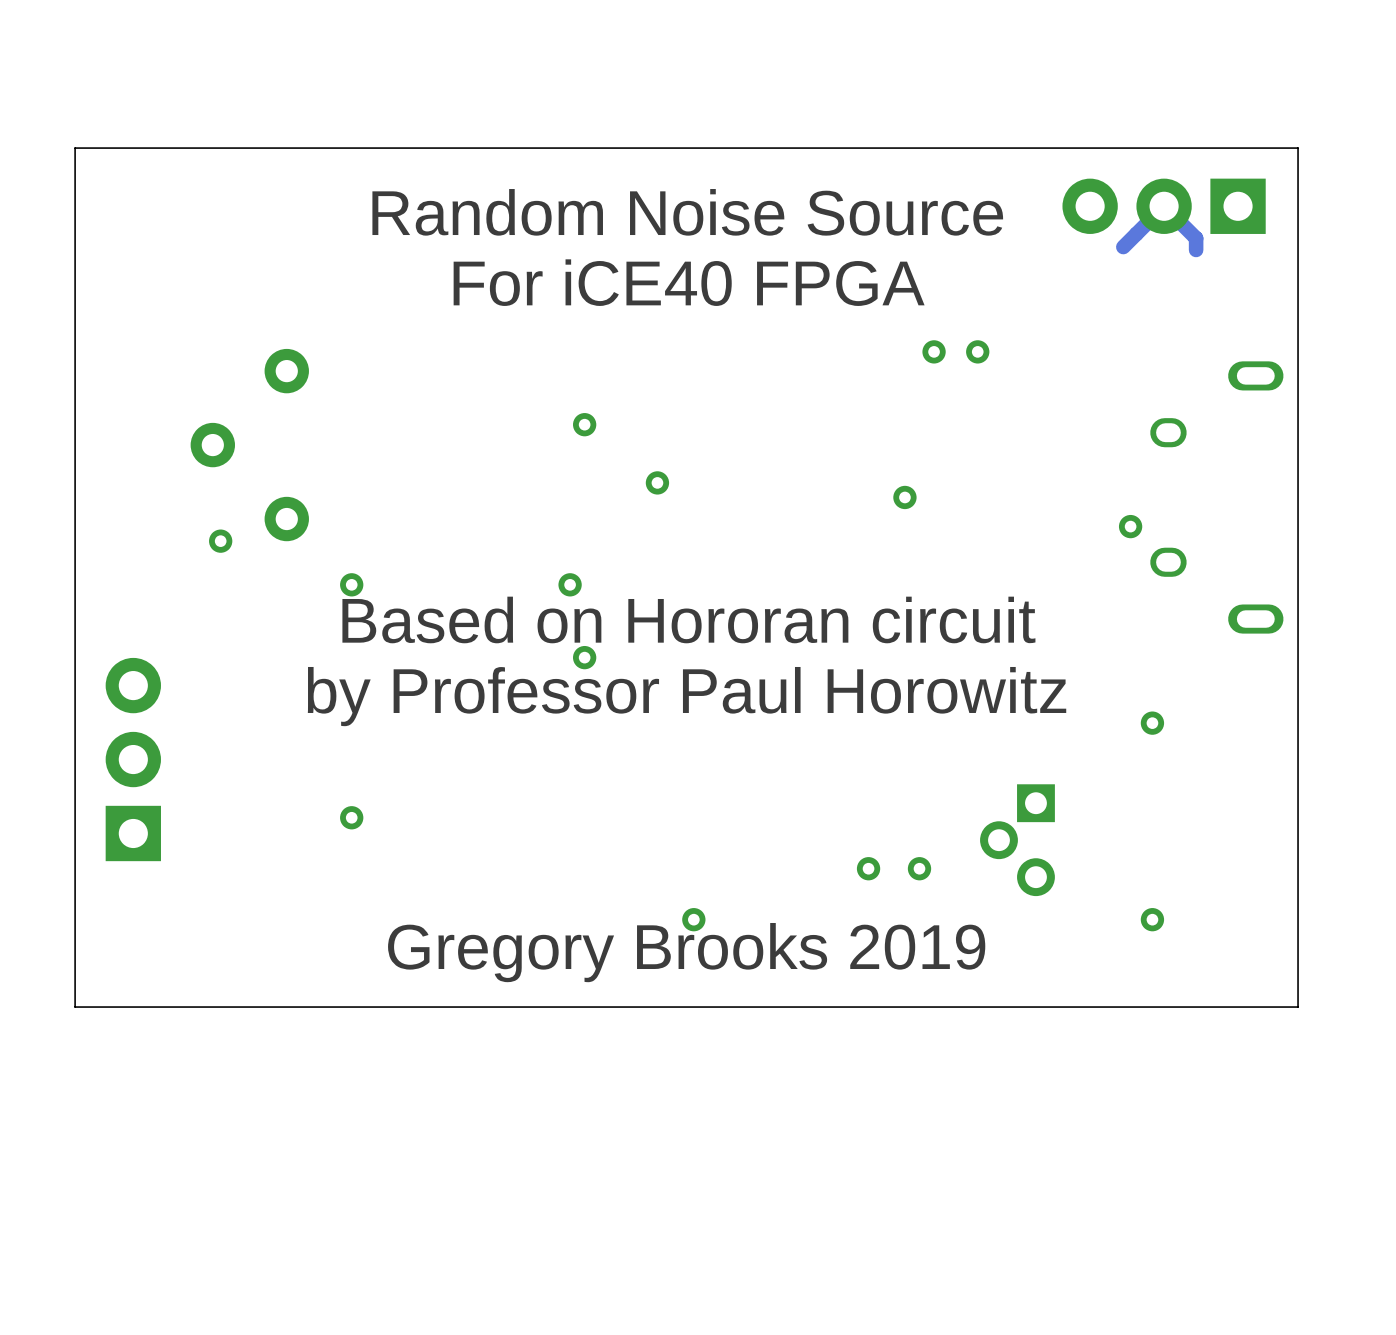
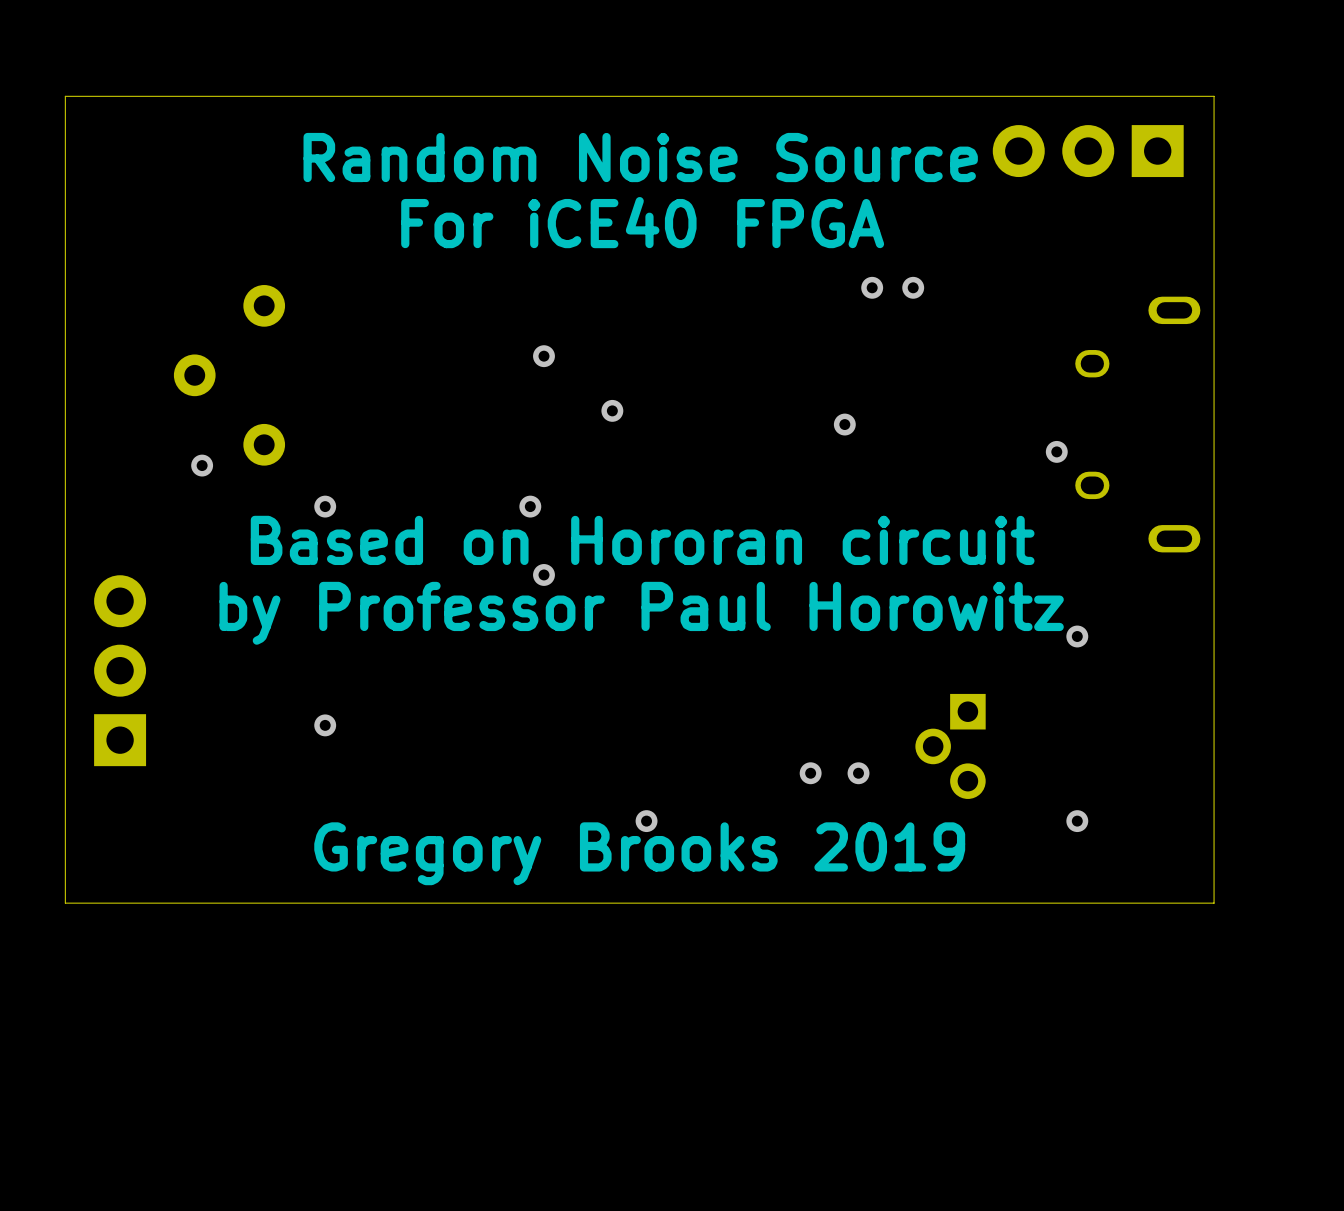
track: (1123, 247) (1164, 206) (1196, 238) (1196, 249) -> none

